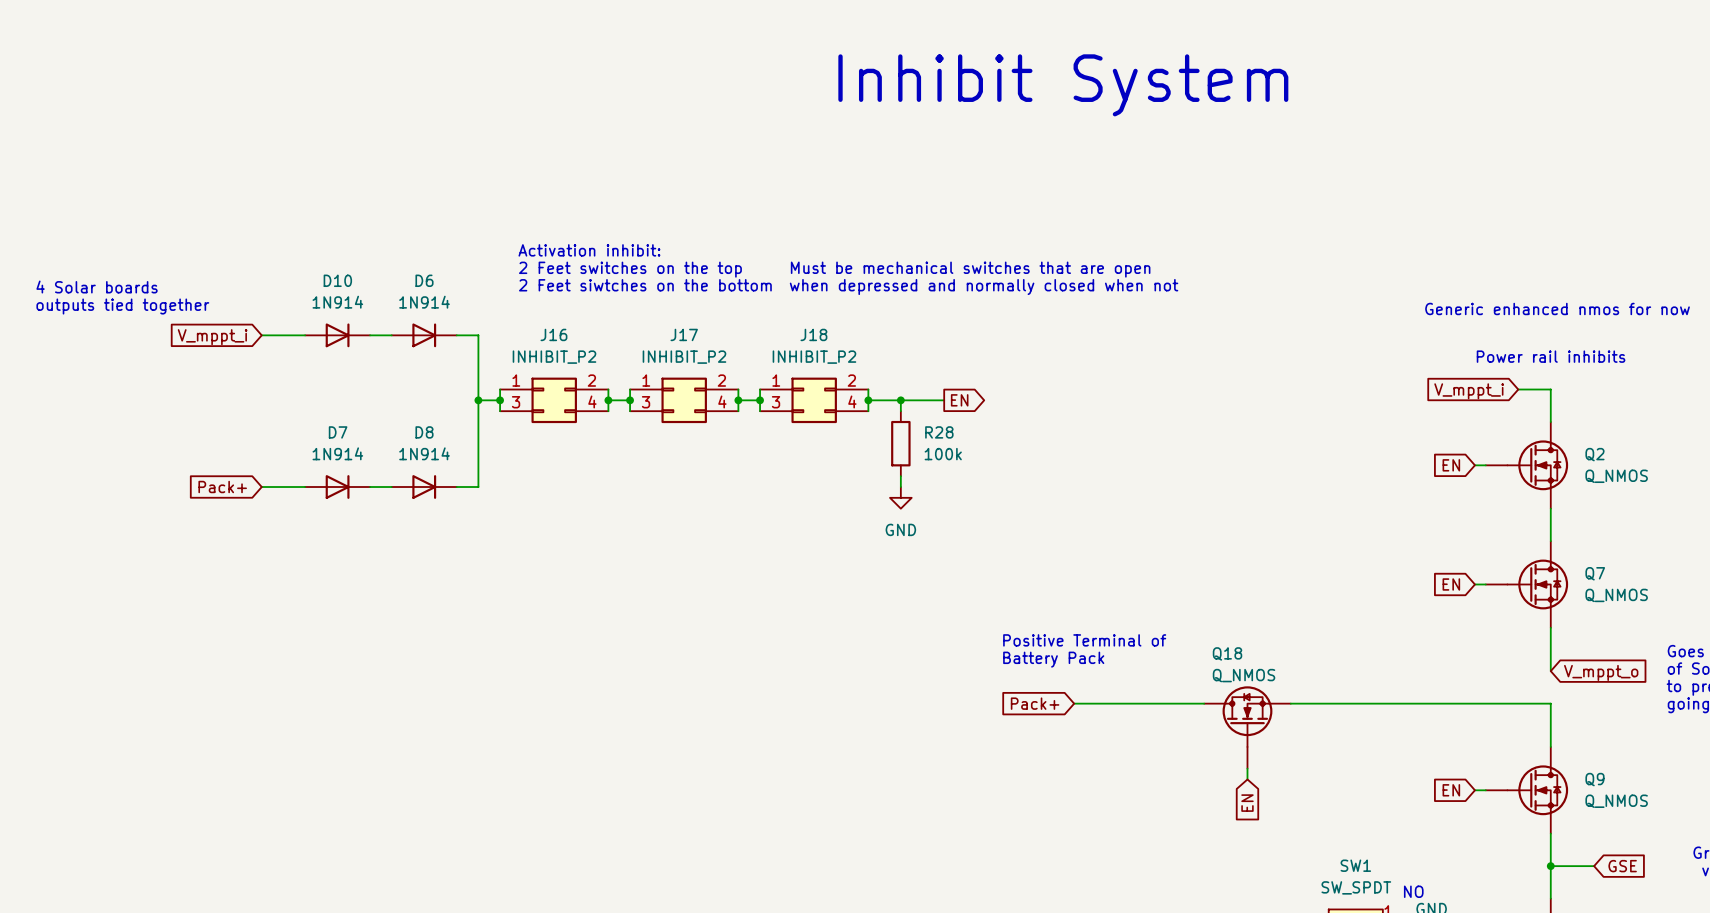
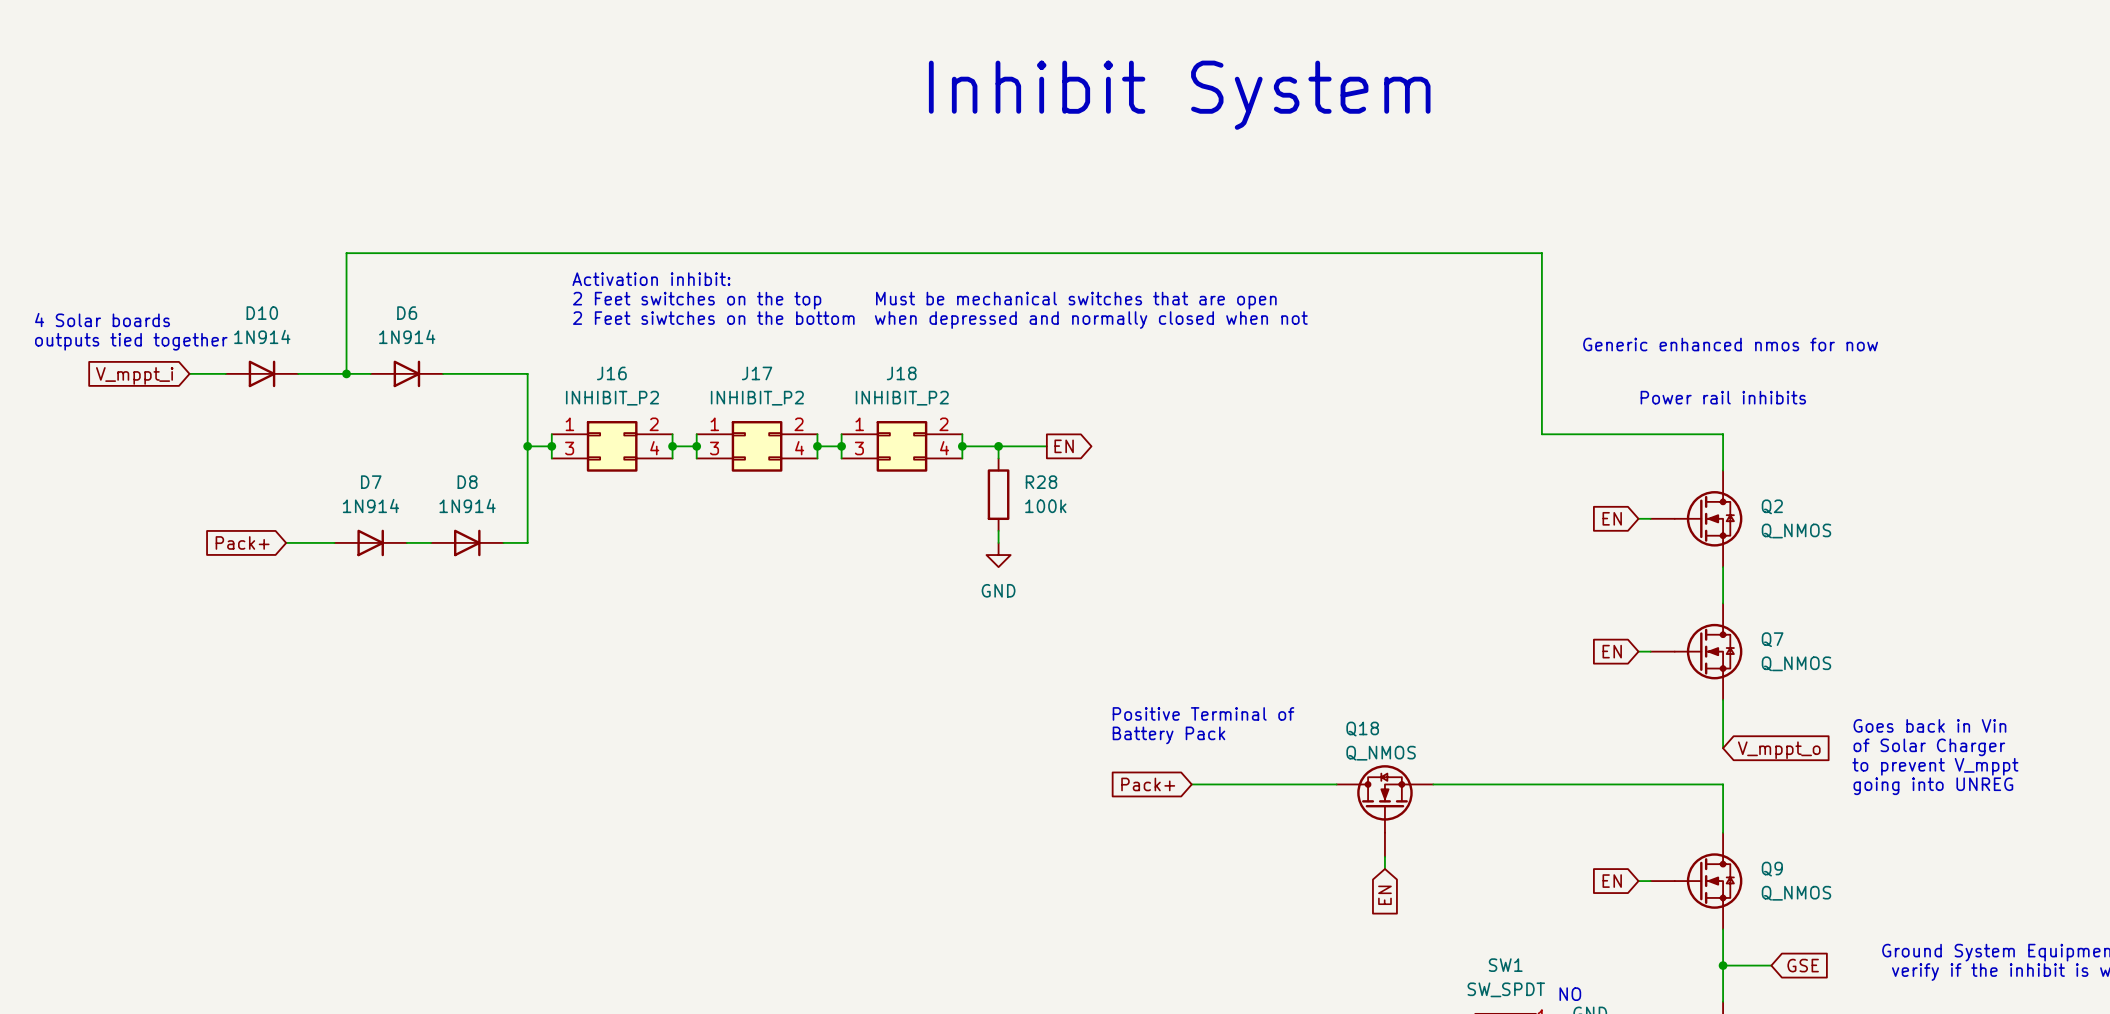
wire: none -> (189, 373) (225, 373)
wire: none -> (346, 373) (346, 253) (1541, 253) (1541, 434) (1686, 434)
junction: none -> (346, 373)
D10 position: (337, 335) -> (262, 373)
D6 position: (424, 335) -> (406, 373)
global label position: V_mppt_i (212, 337) -> V_mppt_i (134, 375)
global label: V_mppt_i (1469, 391) -> none

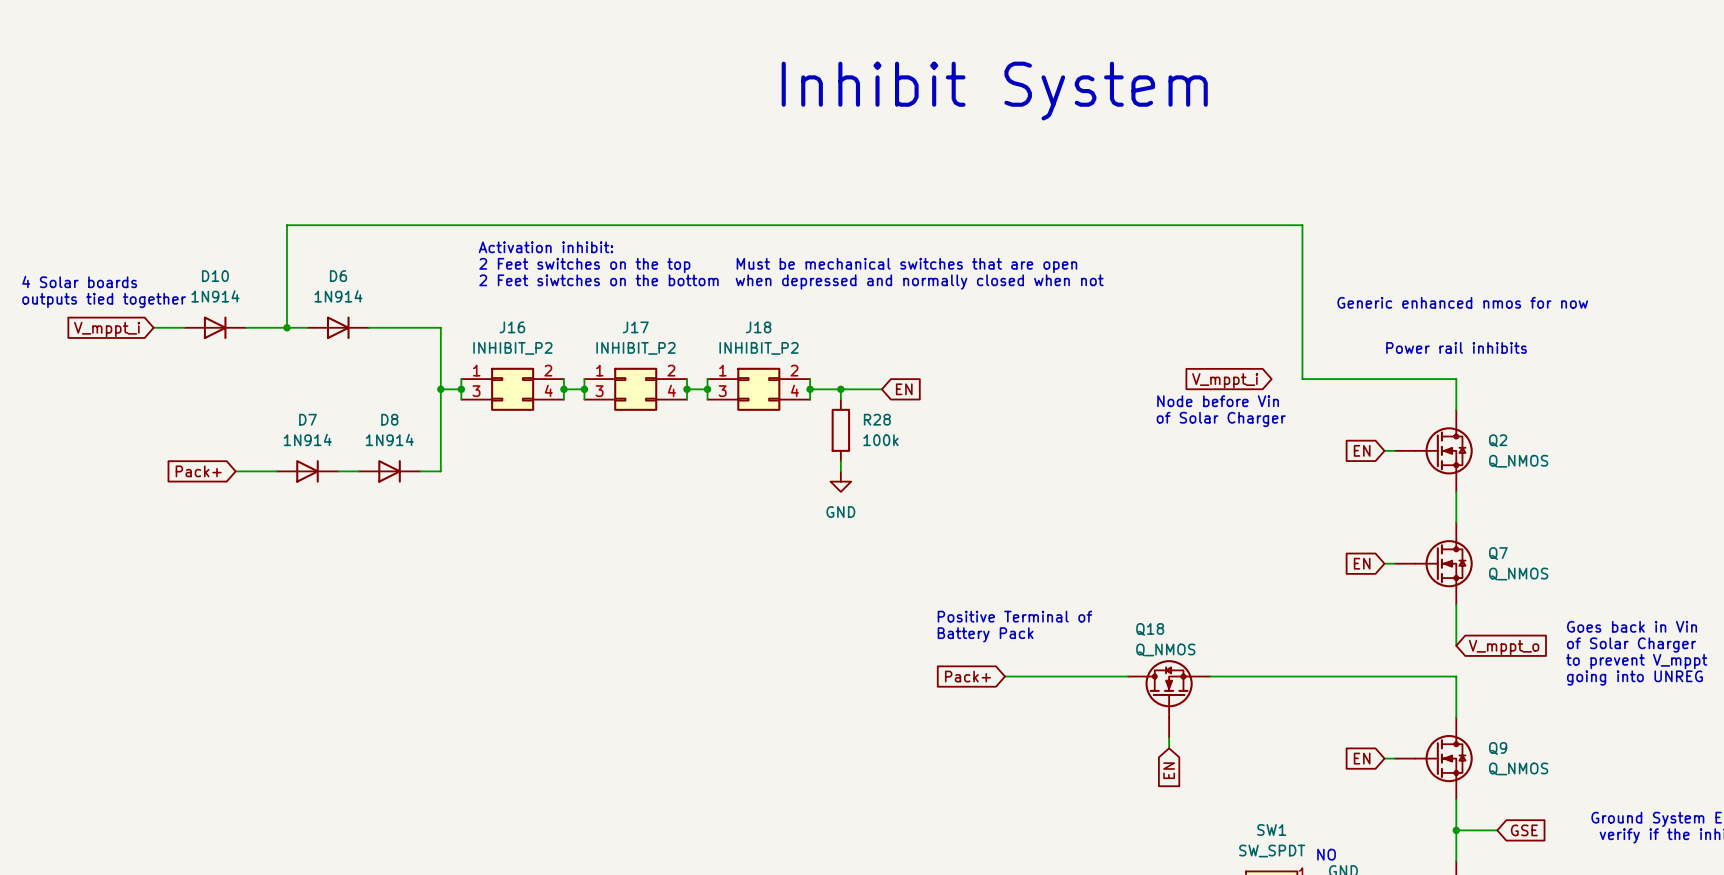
global label: none -> V_mppt_i (1225, 380)
global label shape: output (1064, 446) -> input (904, 389)
text: none -> Node before Vin (1218, 401)
text: none -> of Solar Charger (1221, 419)

